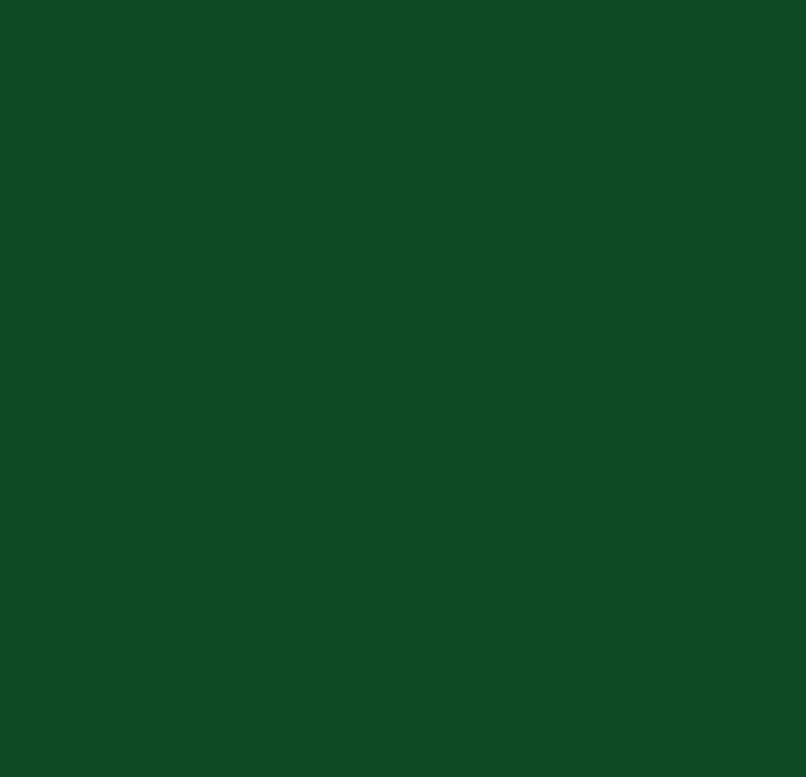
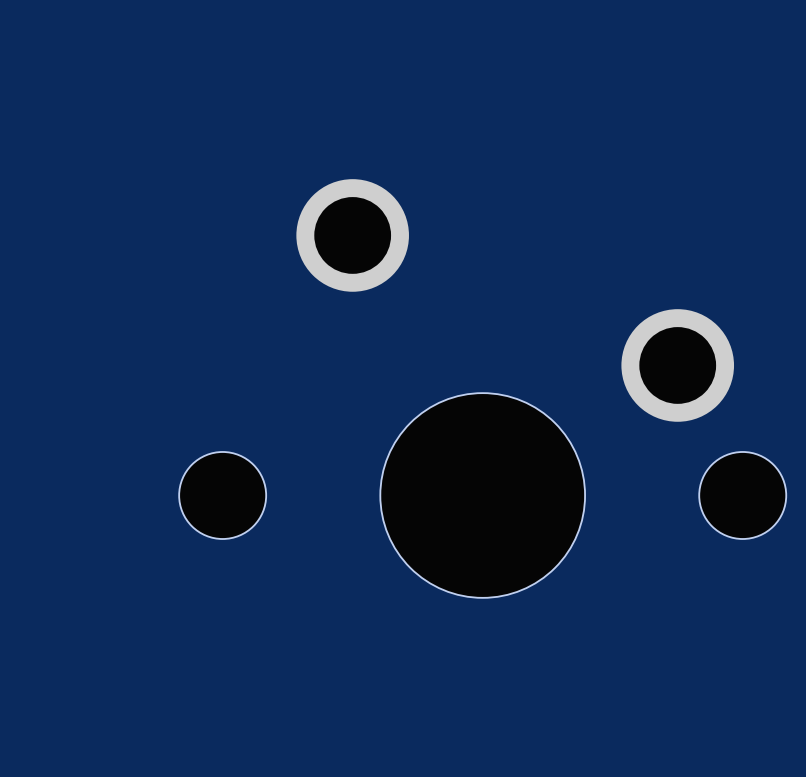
part: none -> (482, 388)

